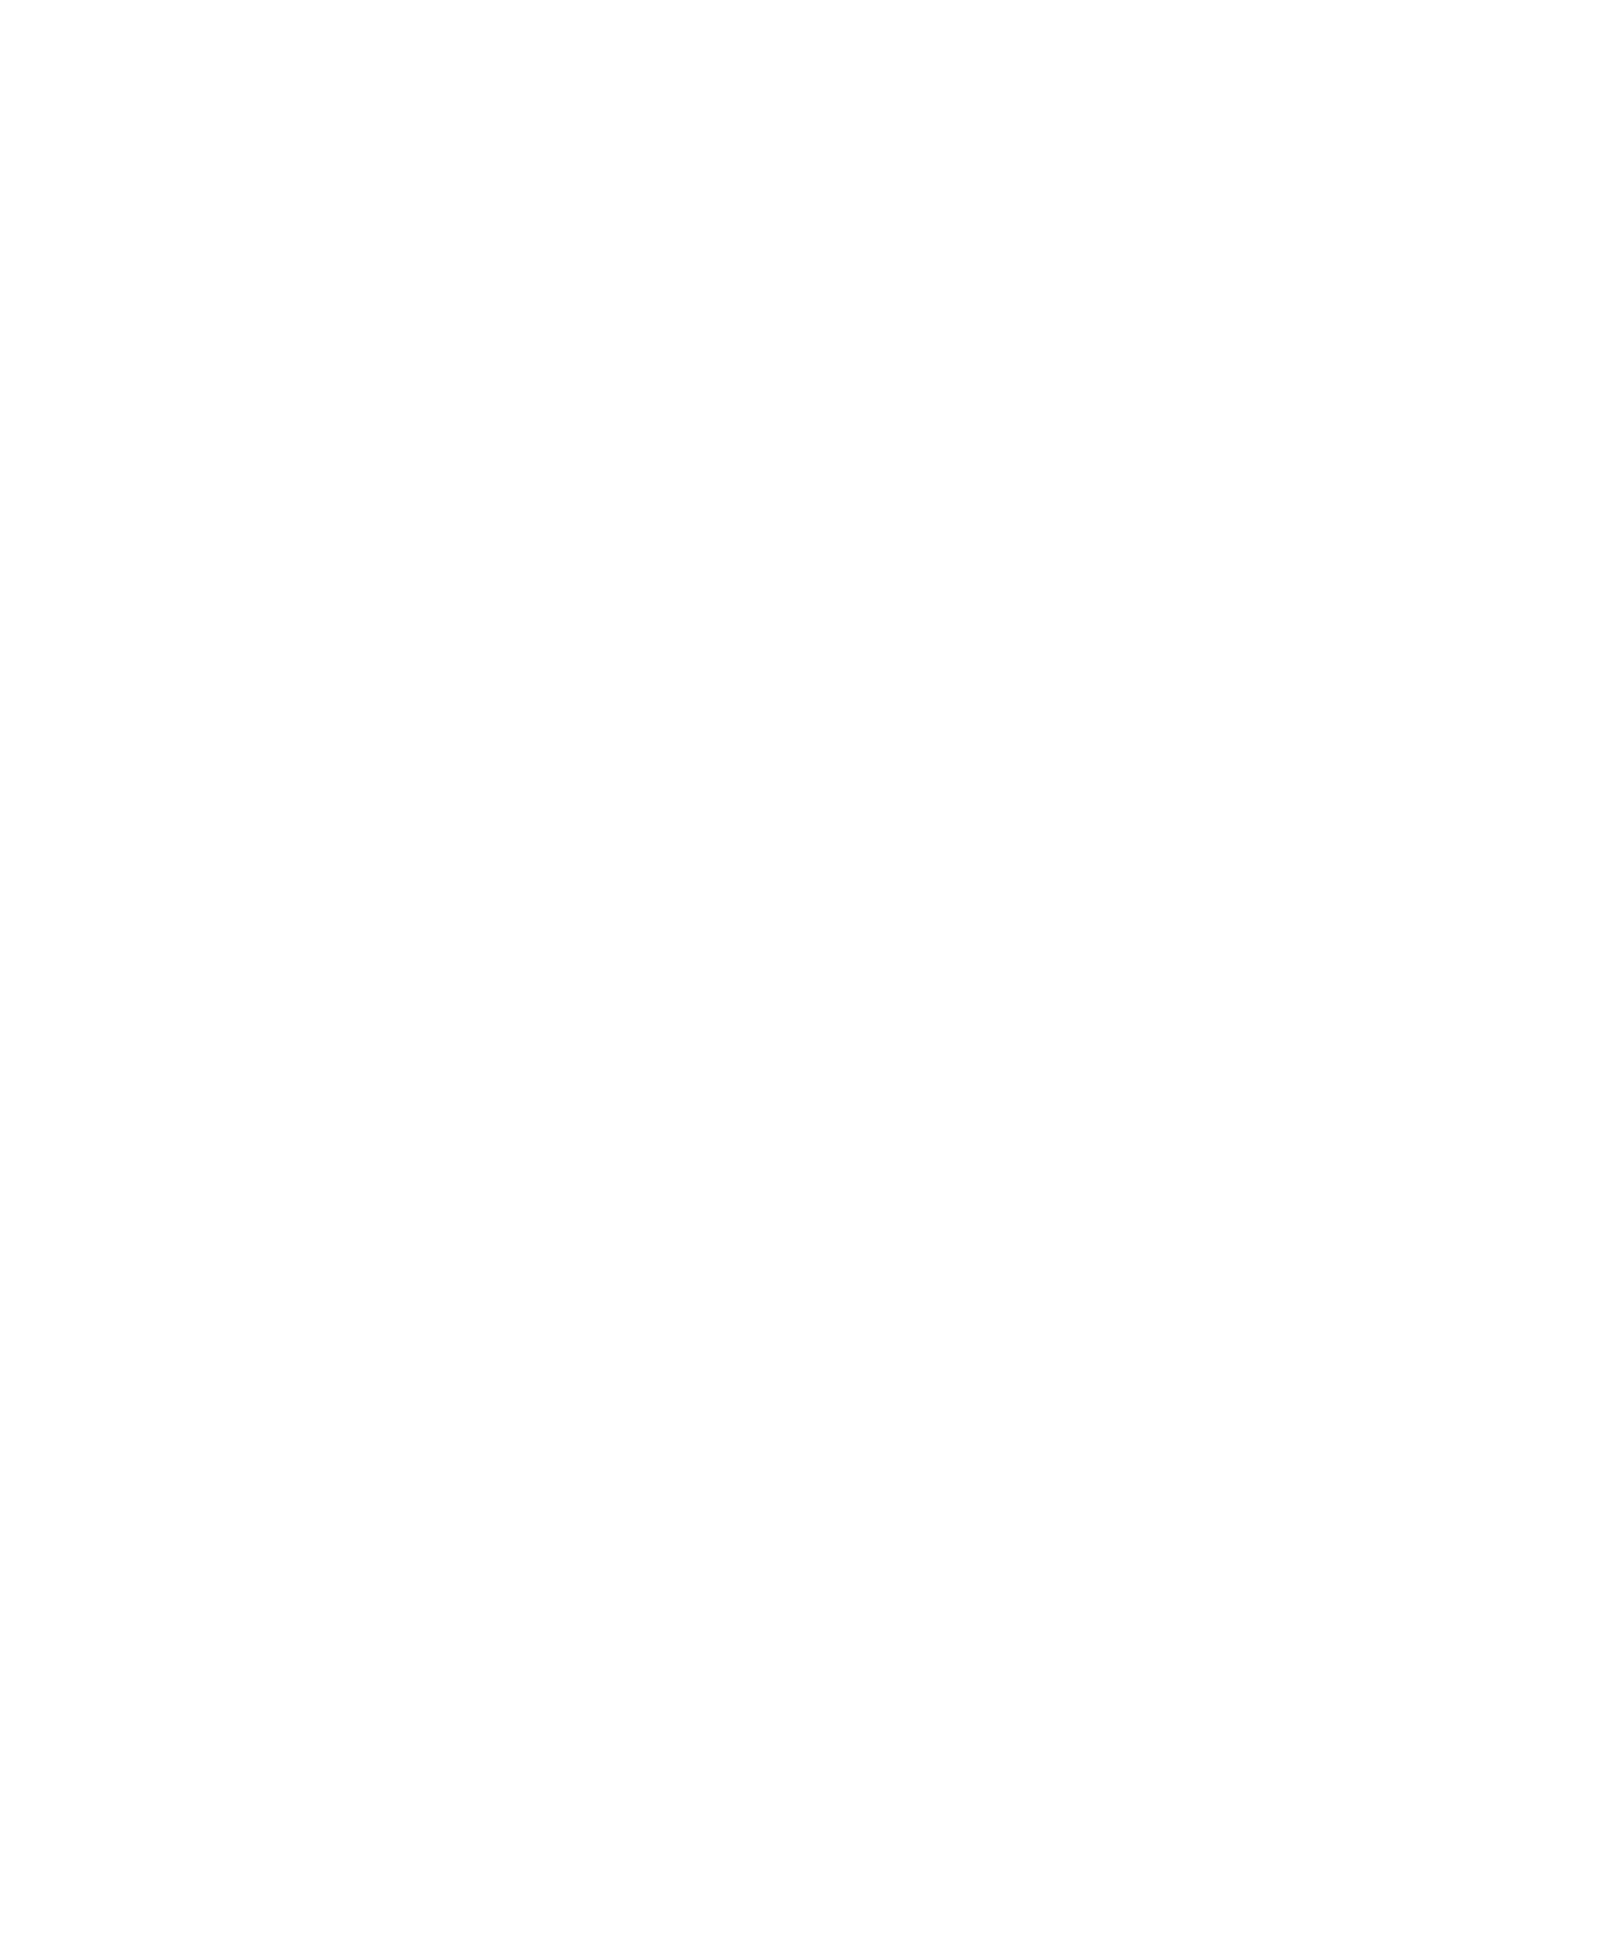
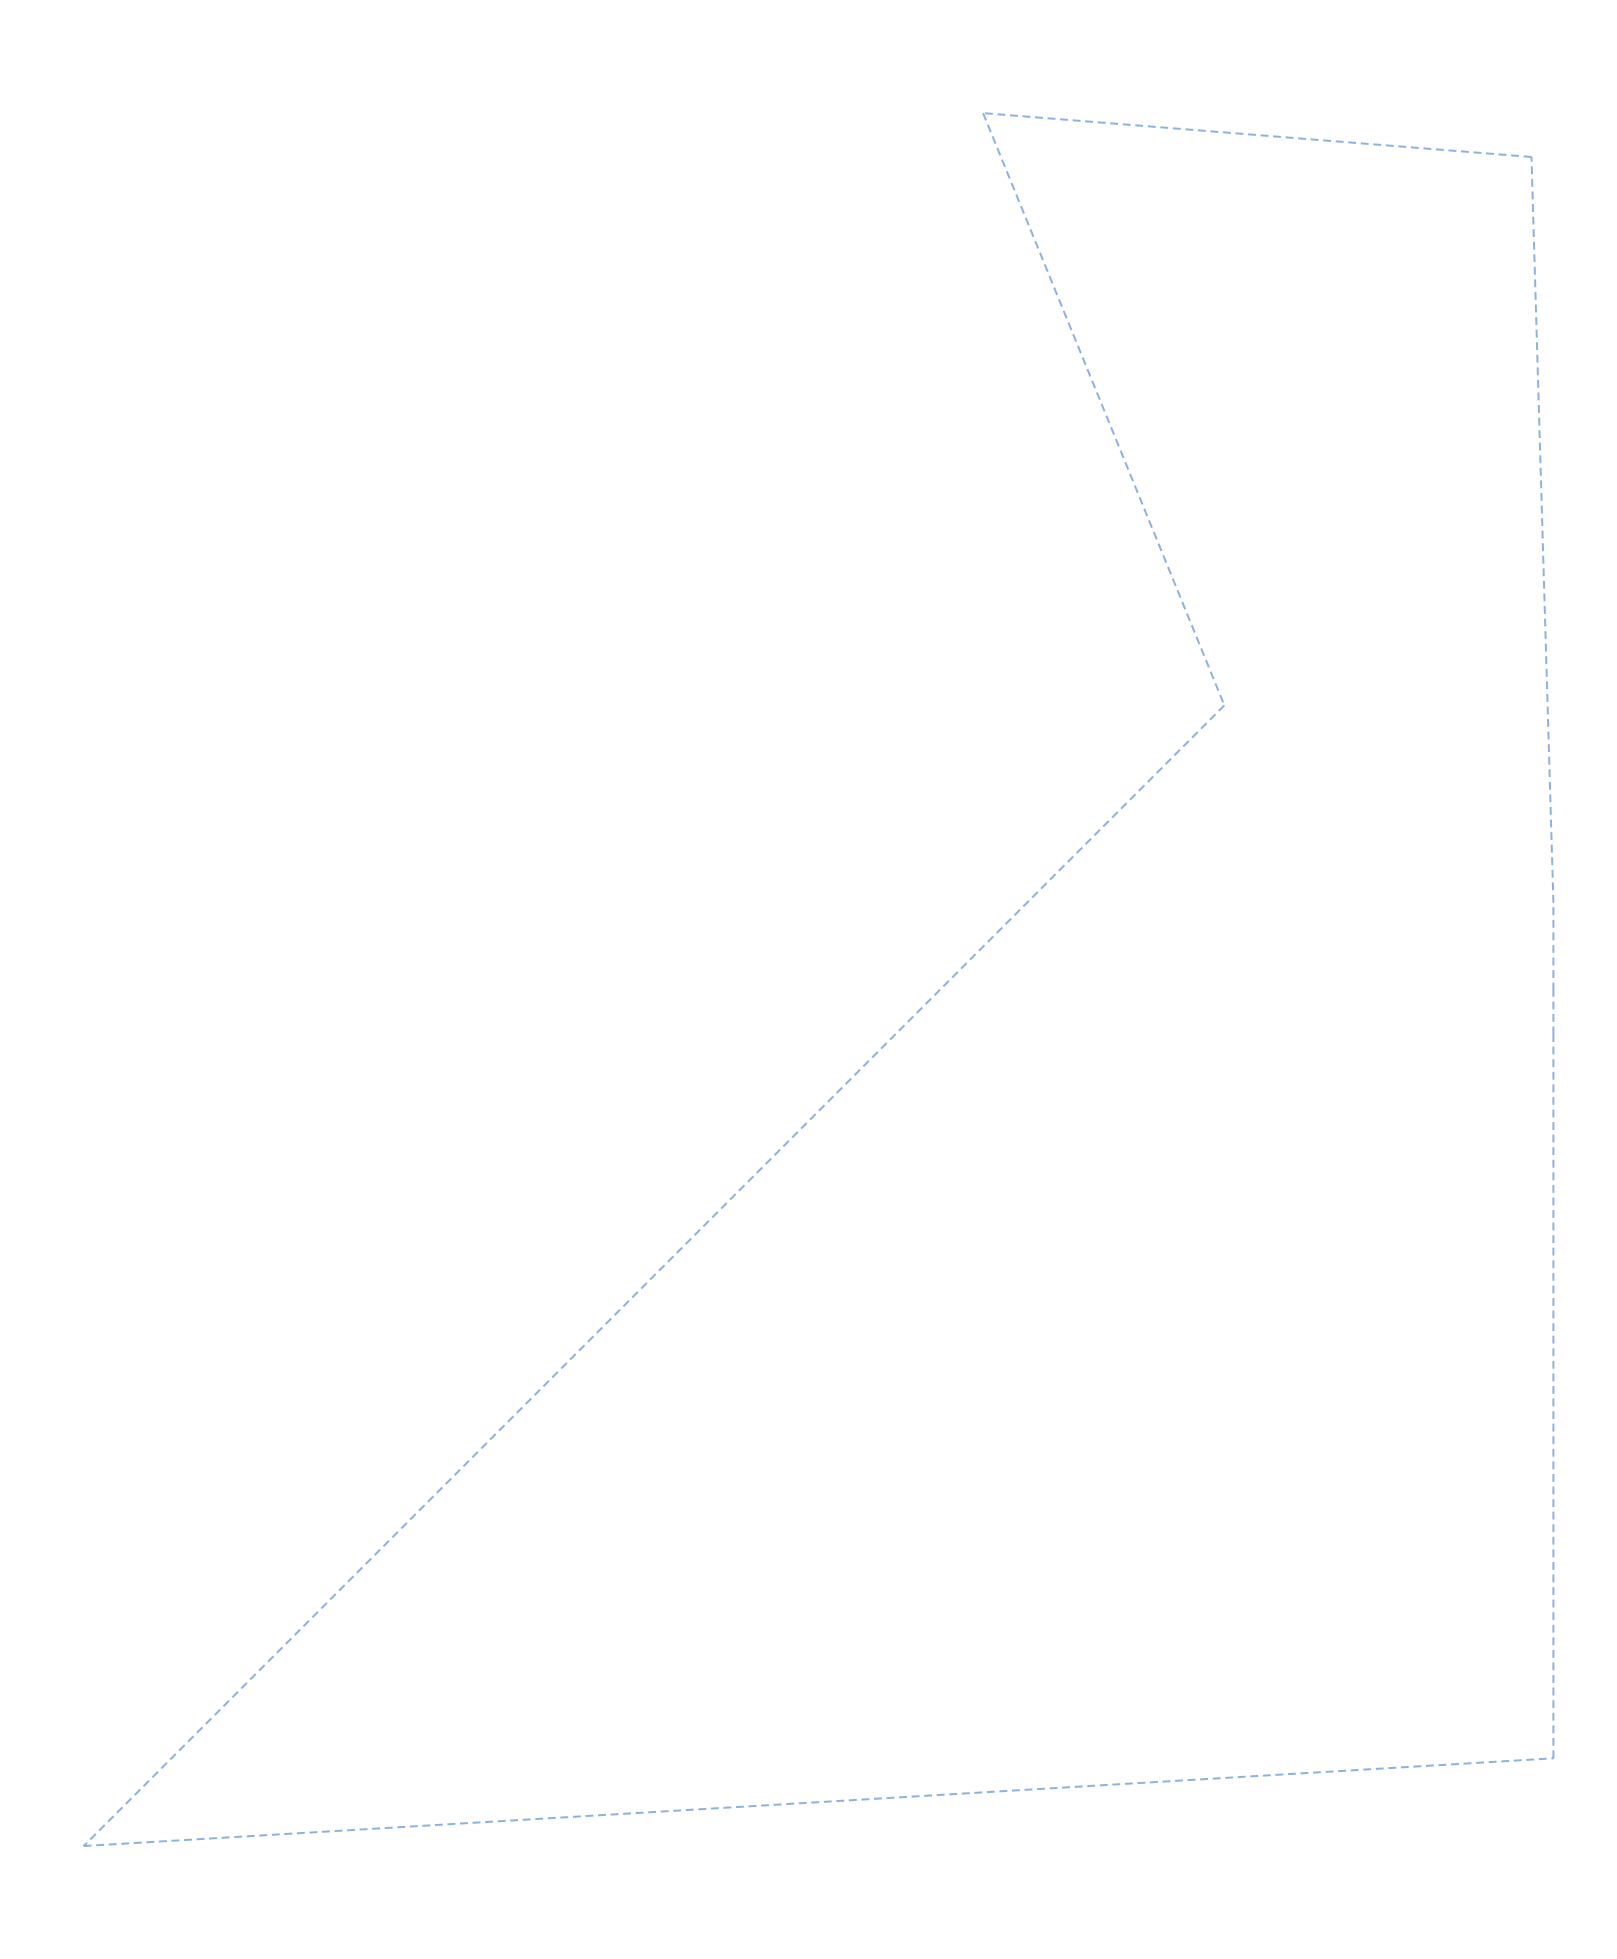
zone outline: none -> (983, 113) (1531, 156) (1553, 902) (1553, 1758) (83, 1846) (1224, 705) (983, 113)

